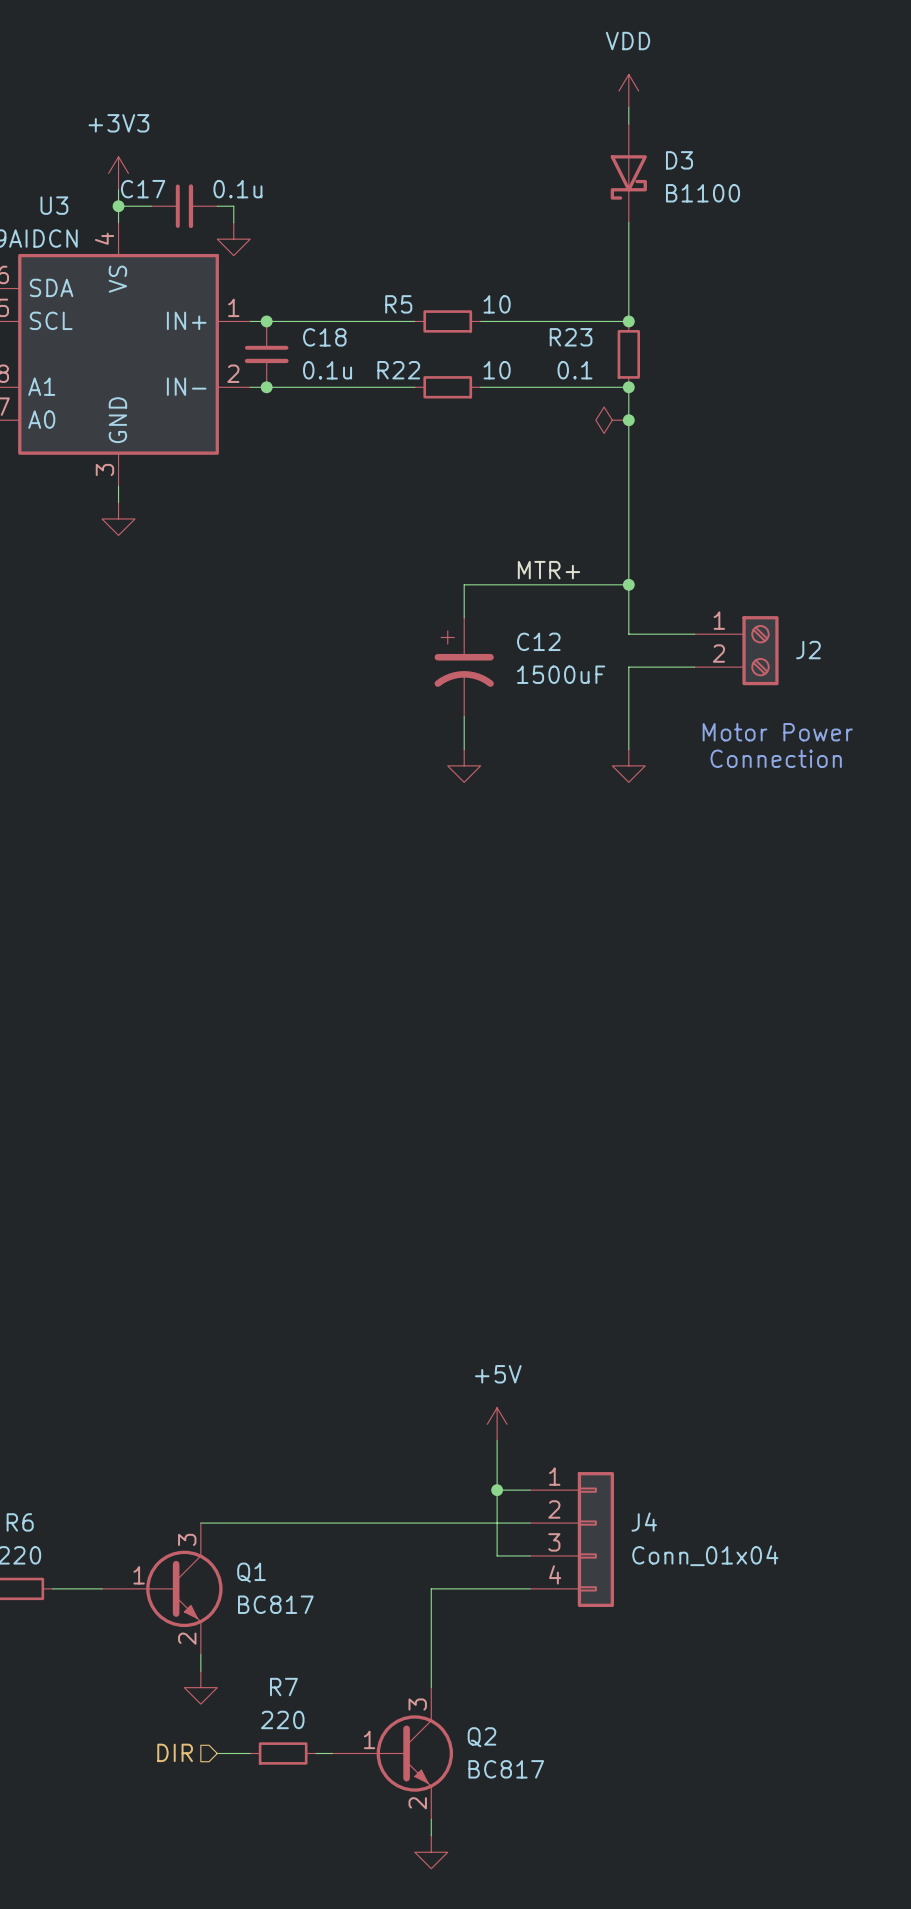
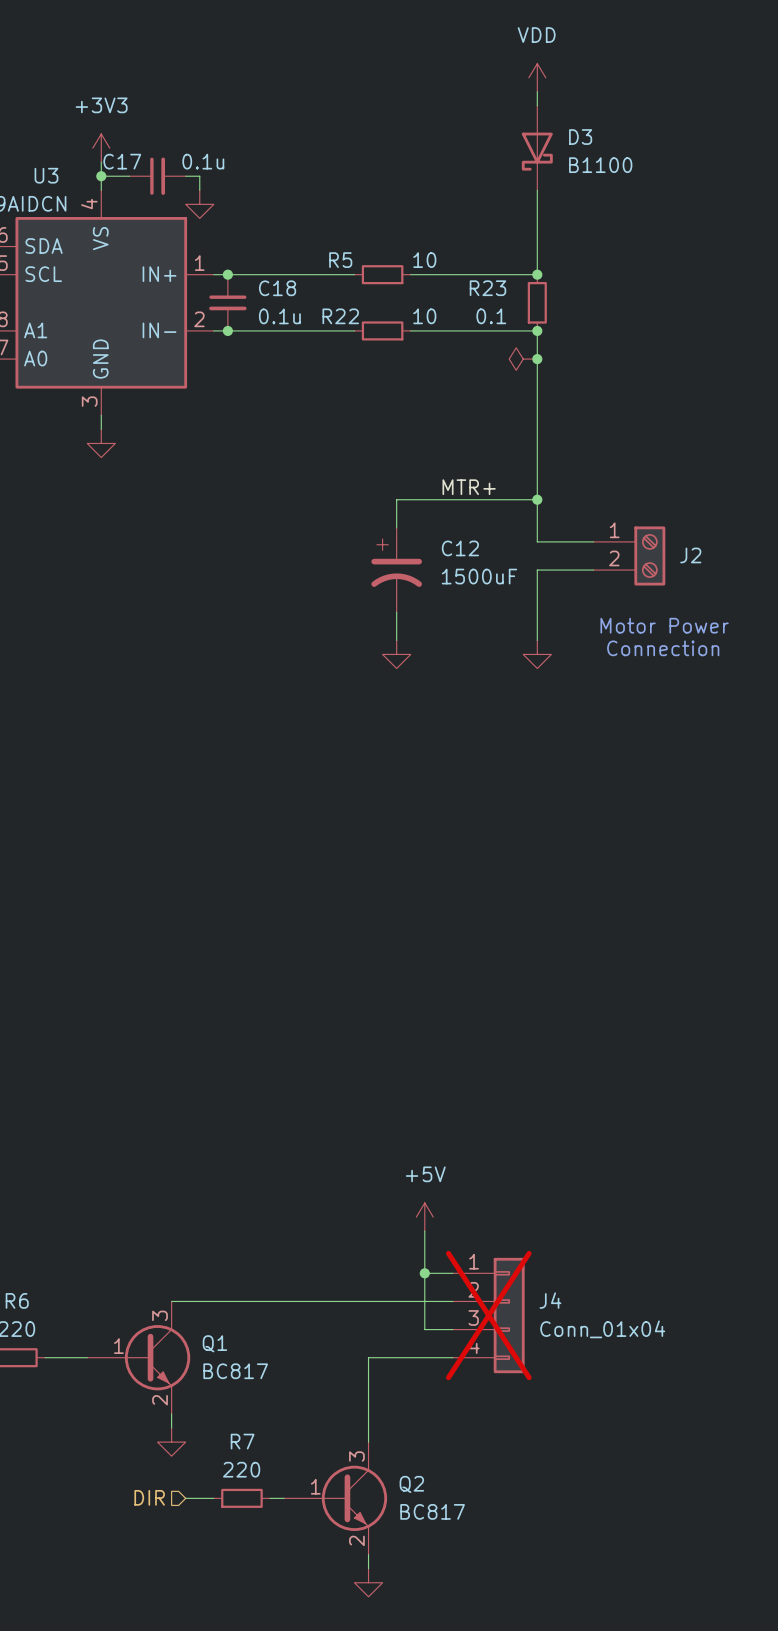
J4 do-not-place cross: none -> (488, 1315)

